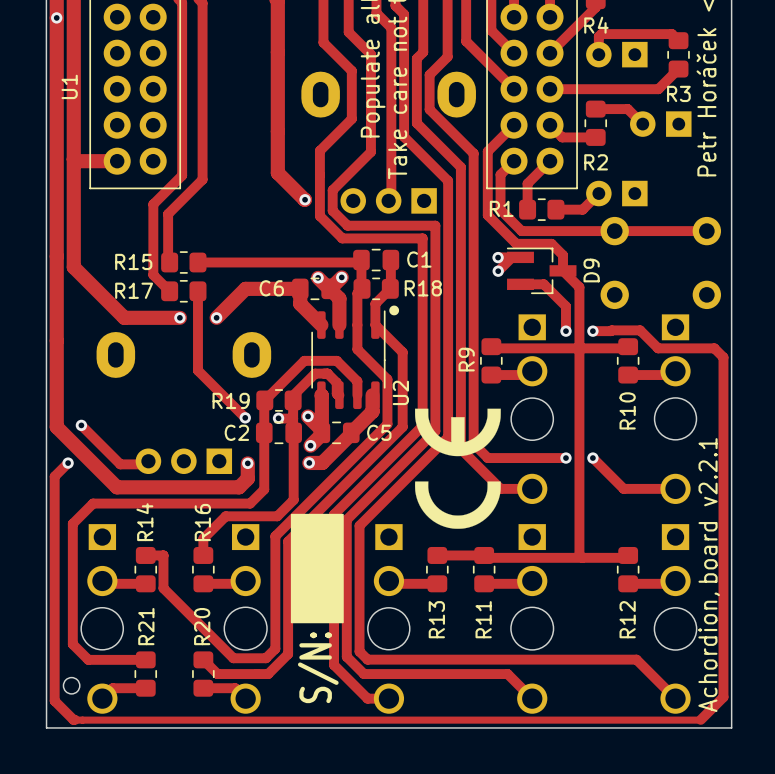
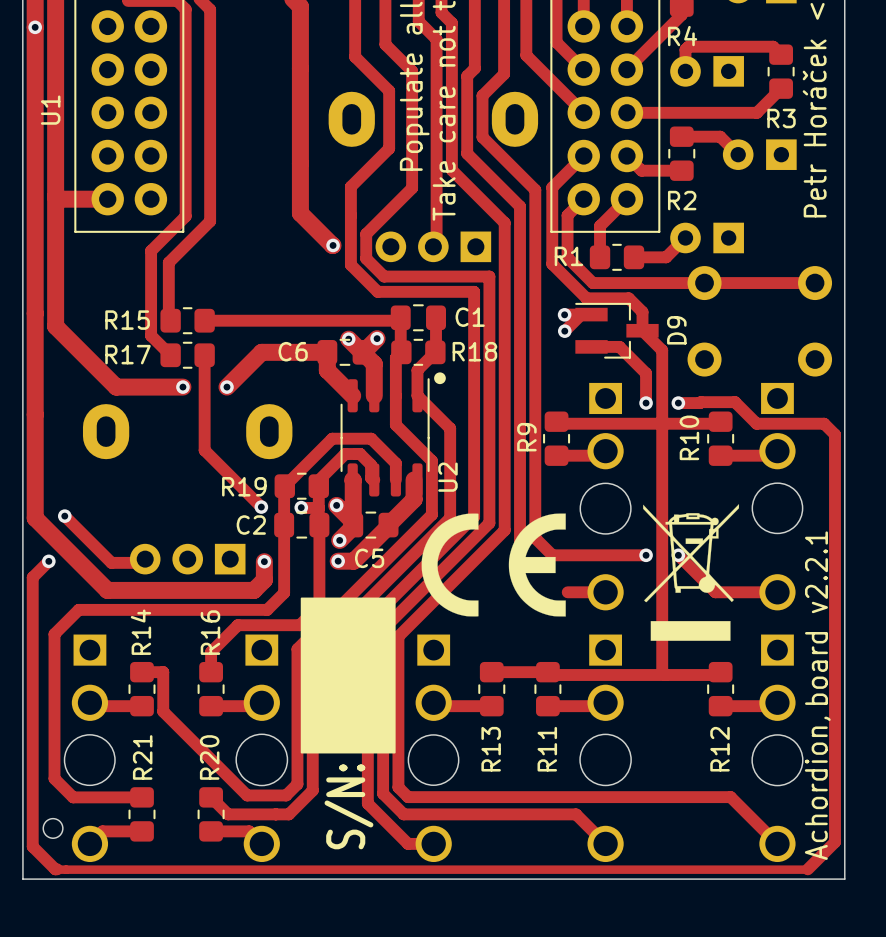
drawing: [415, 408, 501, 529] -> none
R10 name position: R10 (627, 410) -> R10 (689, 437)
drawing: none -> [643, 504, 740, 641]
drawing: none -> [421, 513, 566, 617]
C5 name position: C5 (379, 432) -> C5 (369, 558)
track: (460, 449) (500, 488) -> none
drawing shape: [290, 513, 344, 624] -> [300, 597, 396, 754]

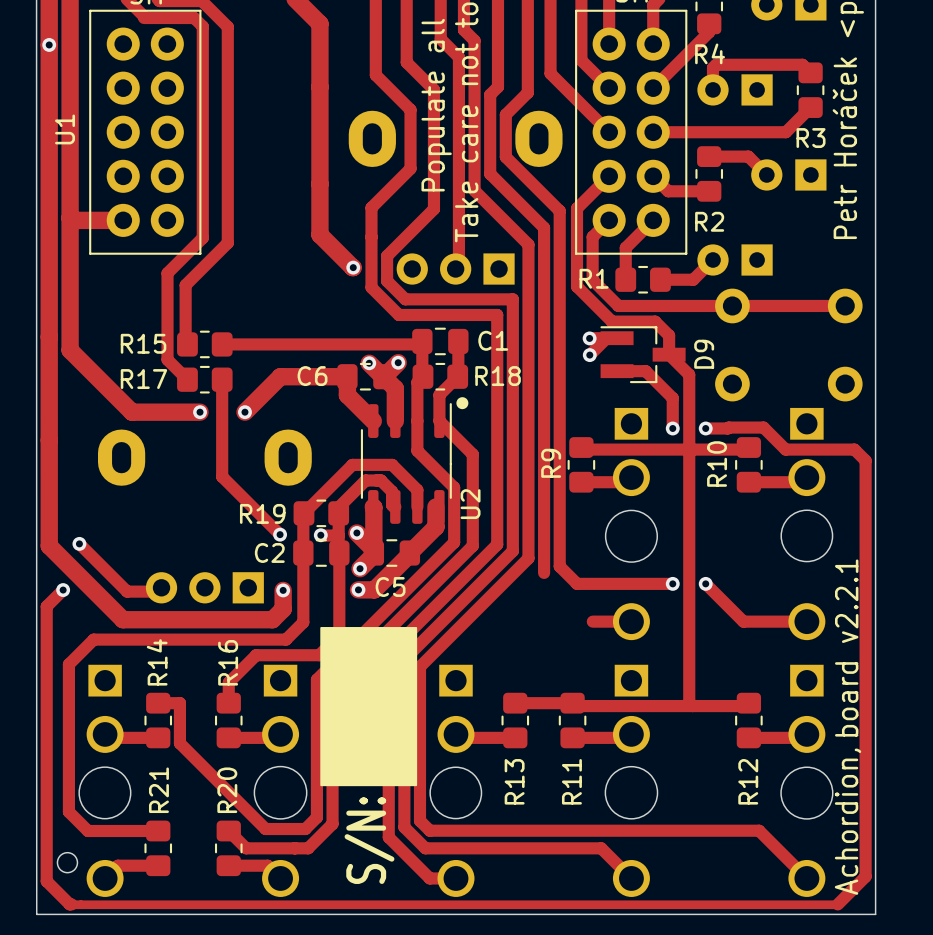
drawing: [643, 504, 740, 641] -> none
drawing: [421, 513, 566, 617] -> none

